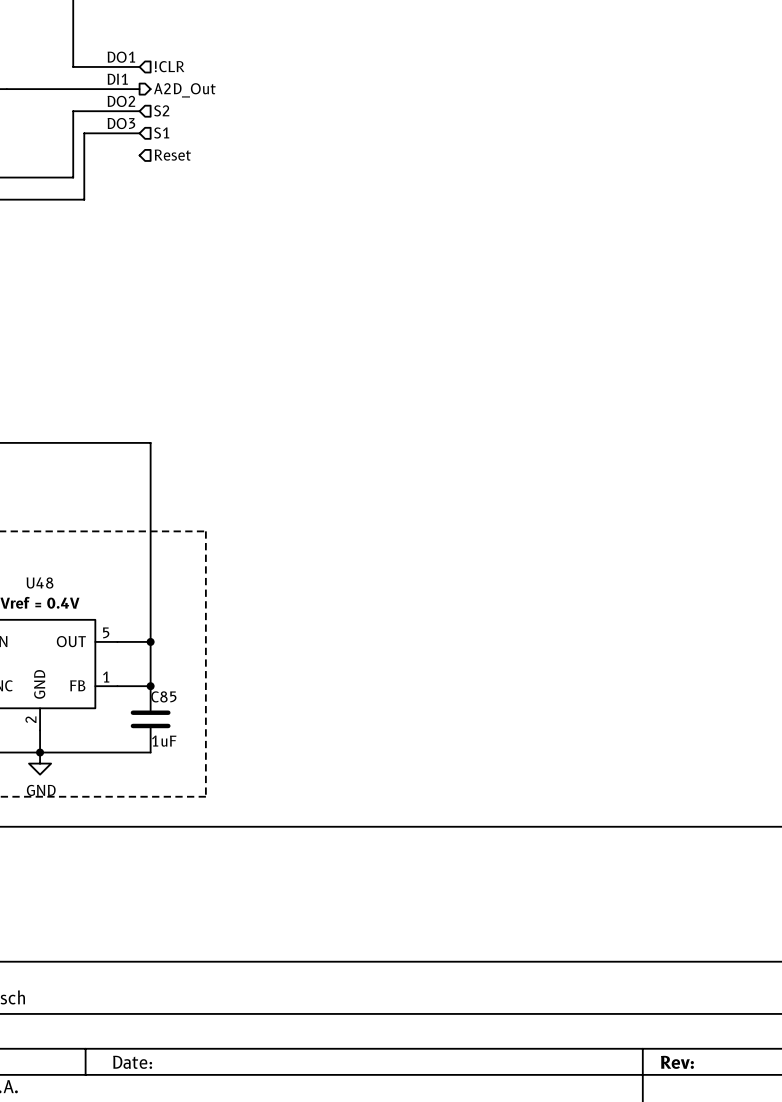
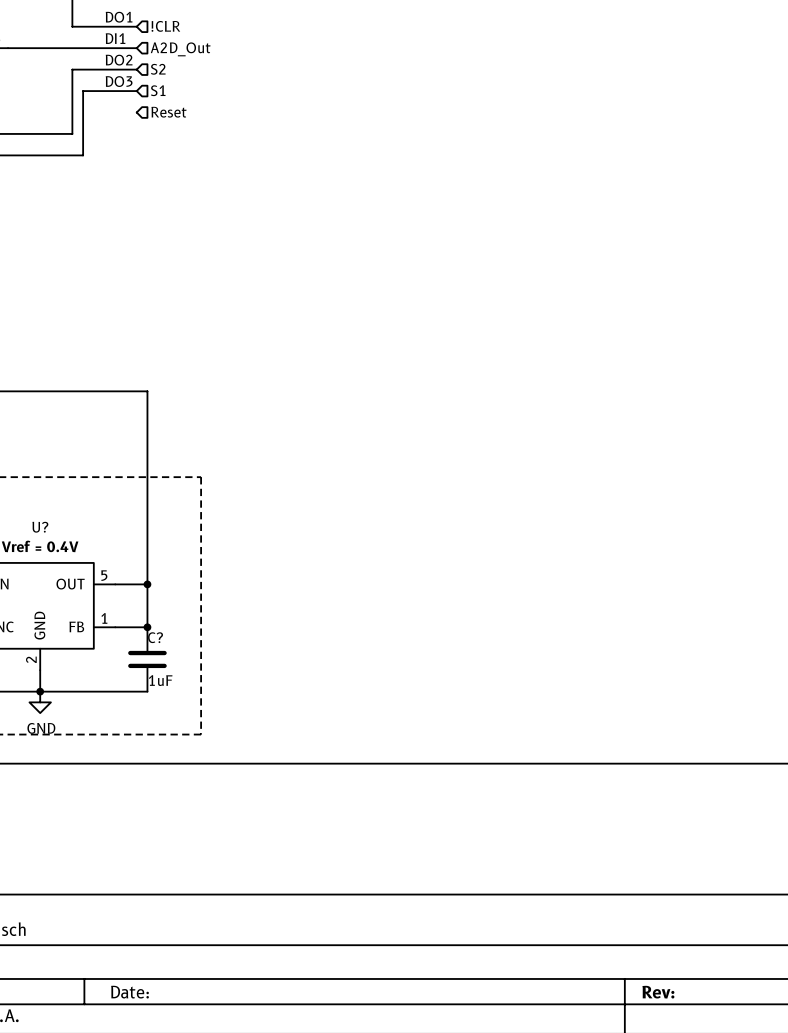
hierarchical label shape: output (184, 90) -> input (180, 49)
U48 name: U48 (39, 583) -> U? (40, 527)
C85 name: C85 (163, 696) -> C? (155, 637)

